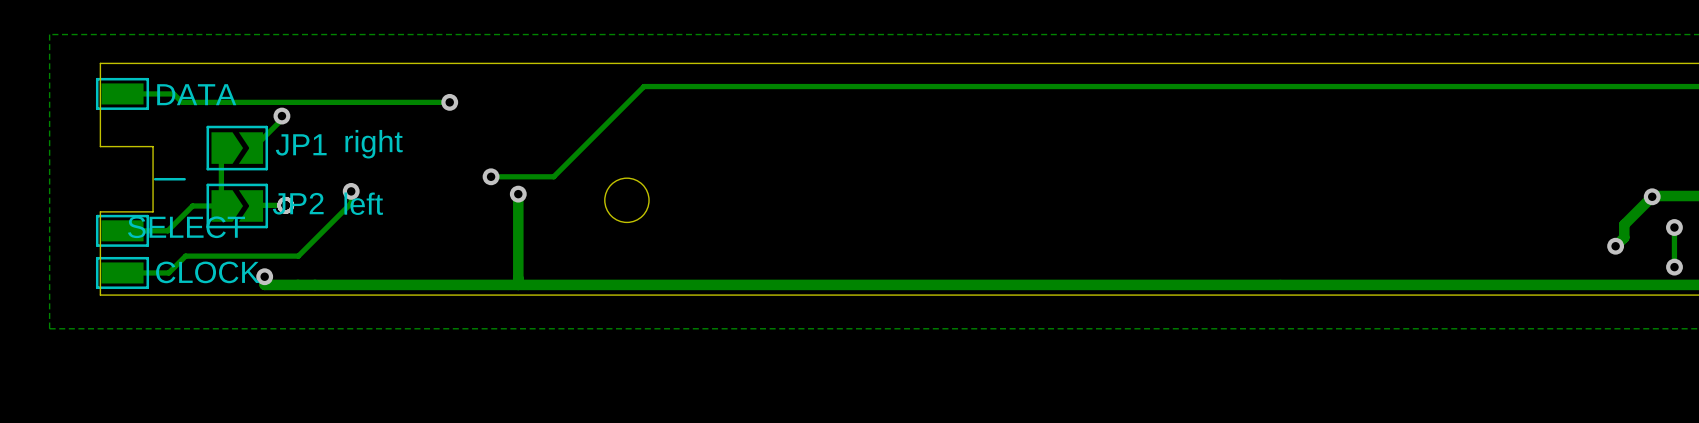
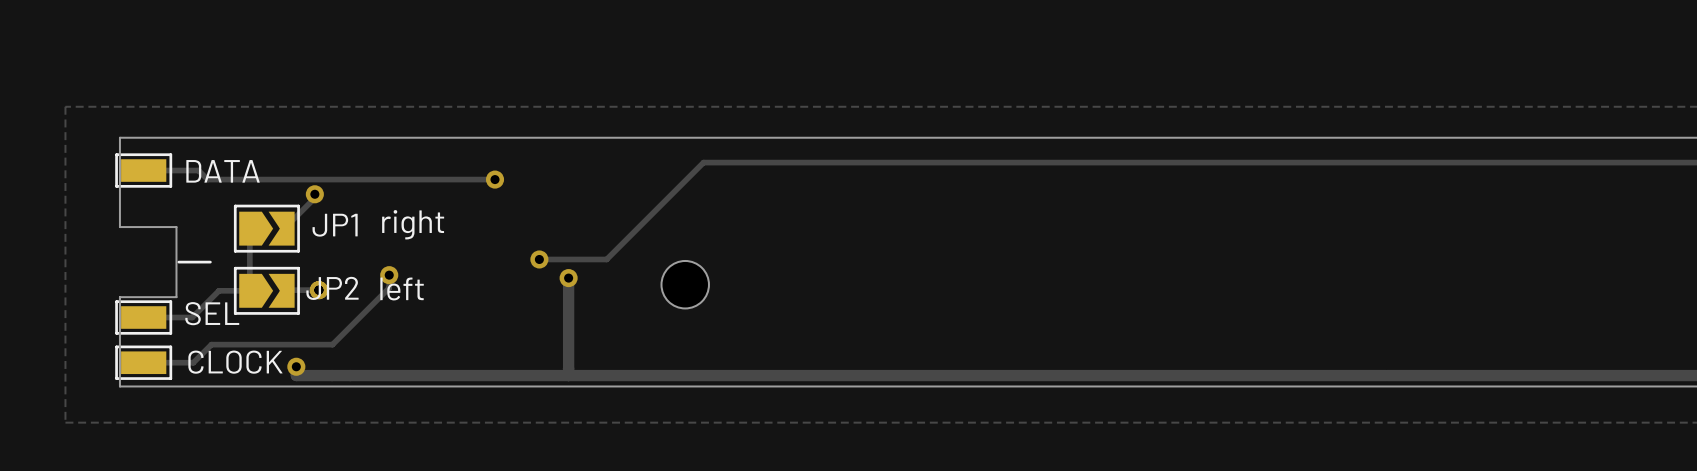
part value: SELECT (186, 227) -> SEL (212, 313)

